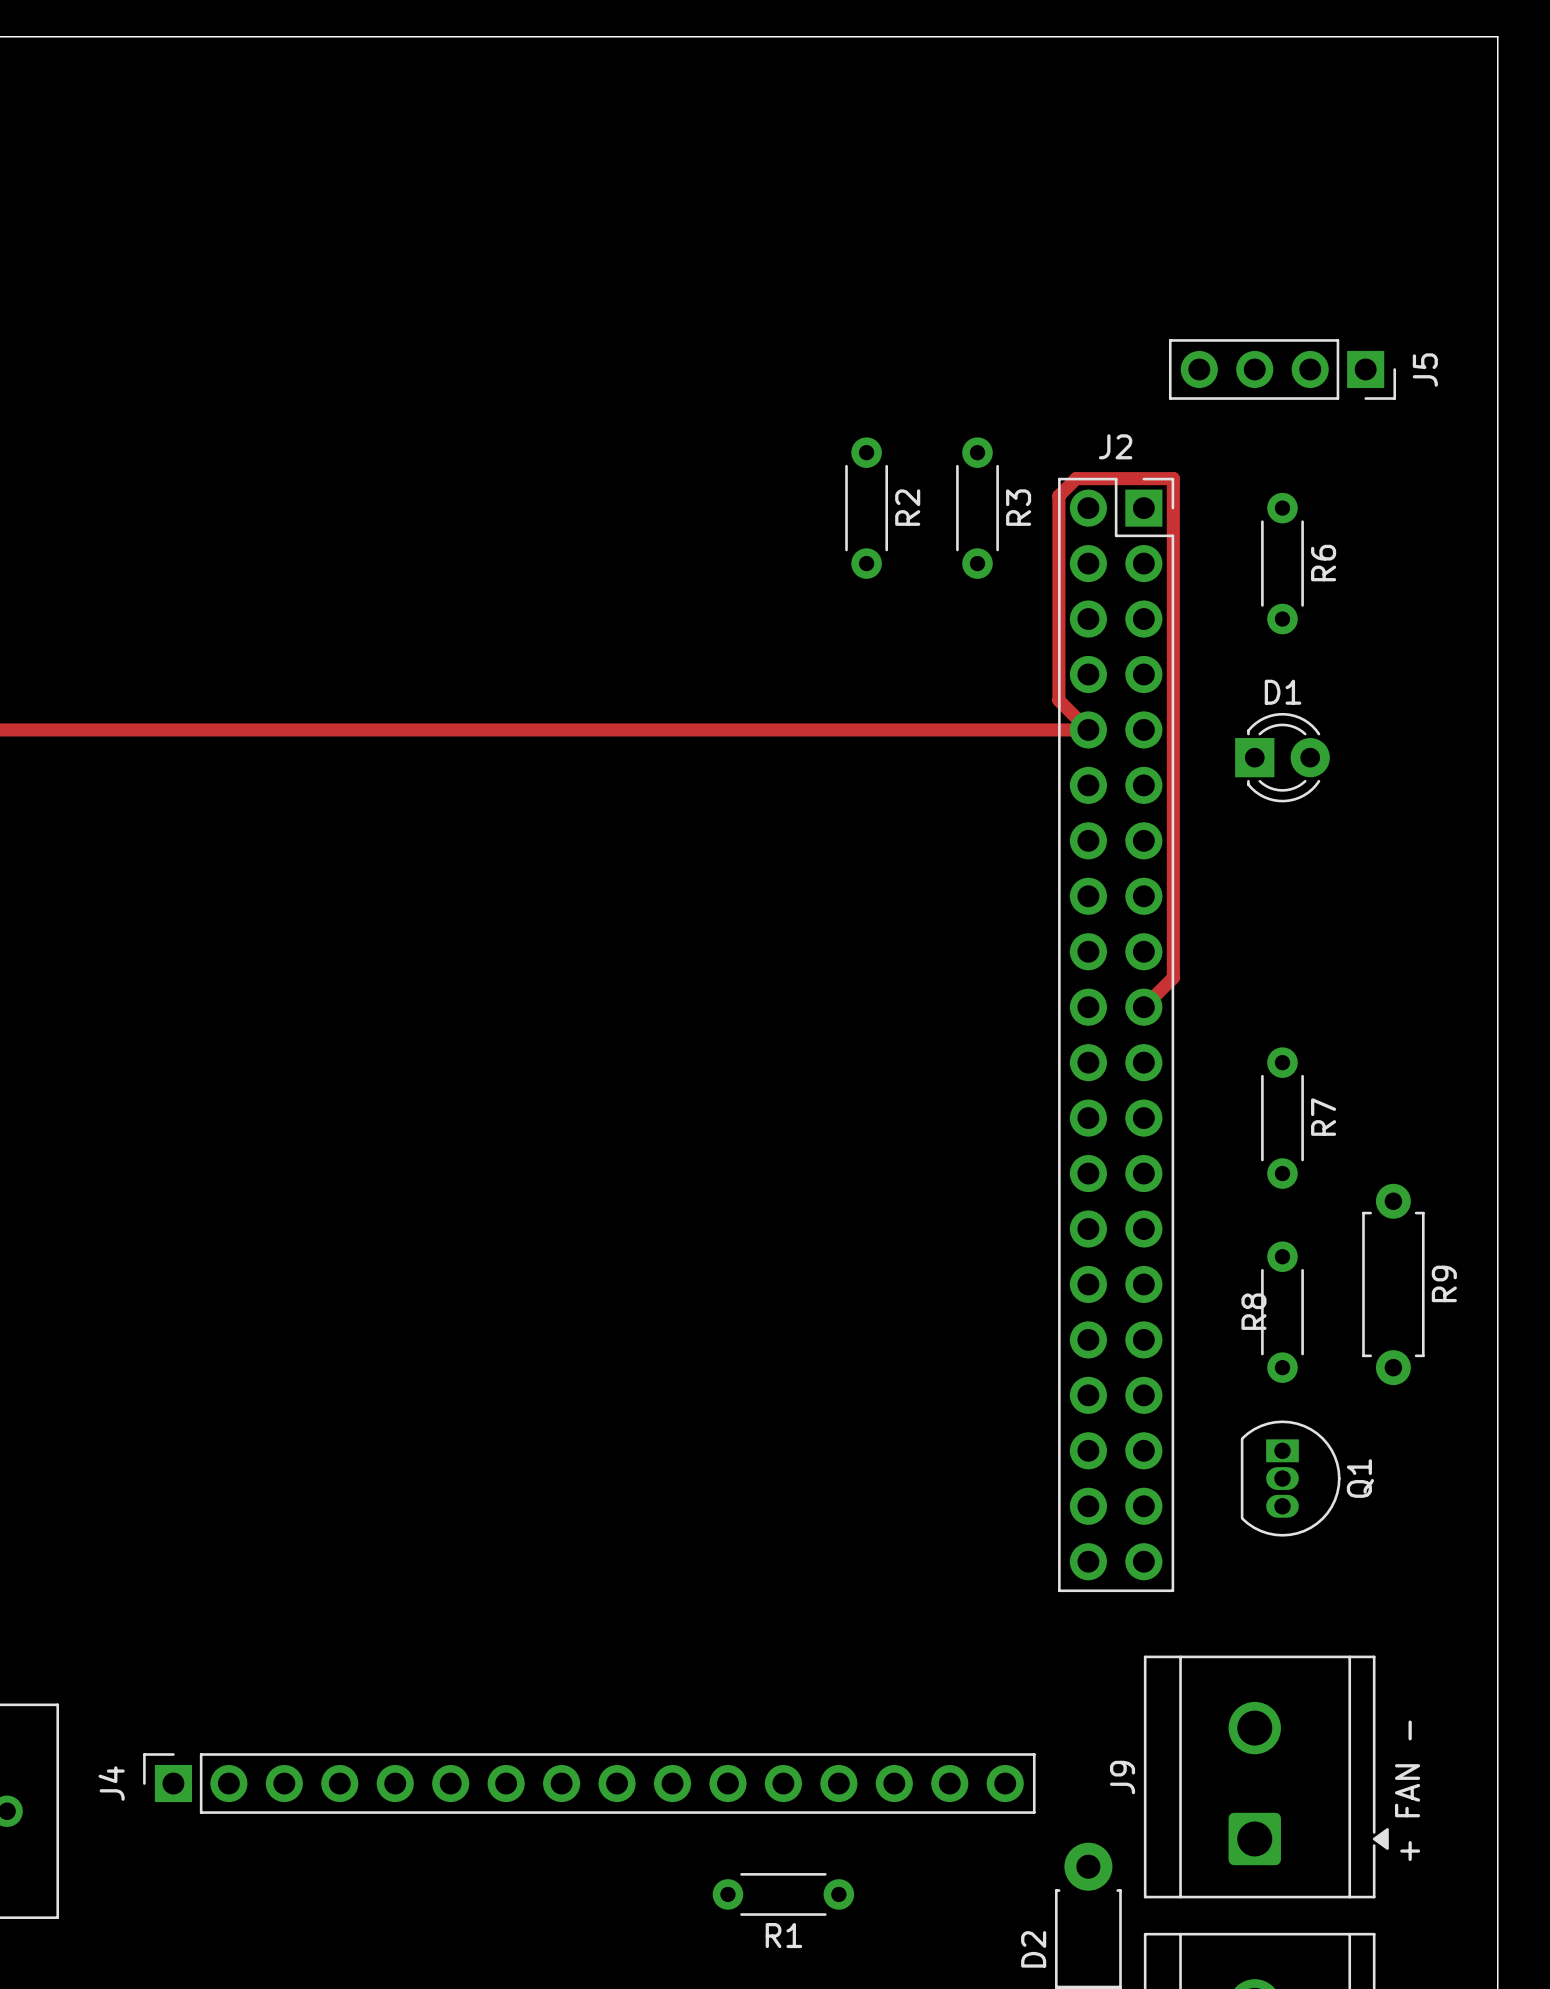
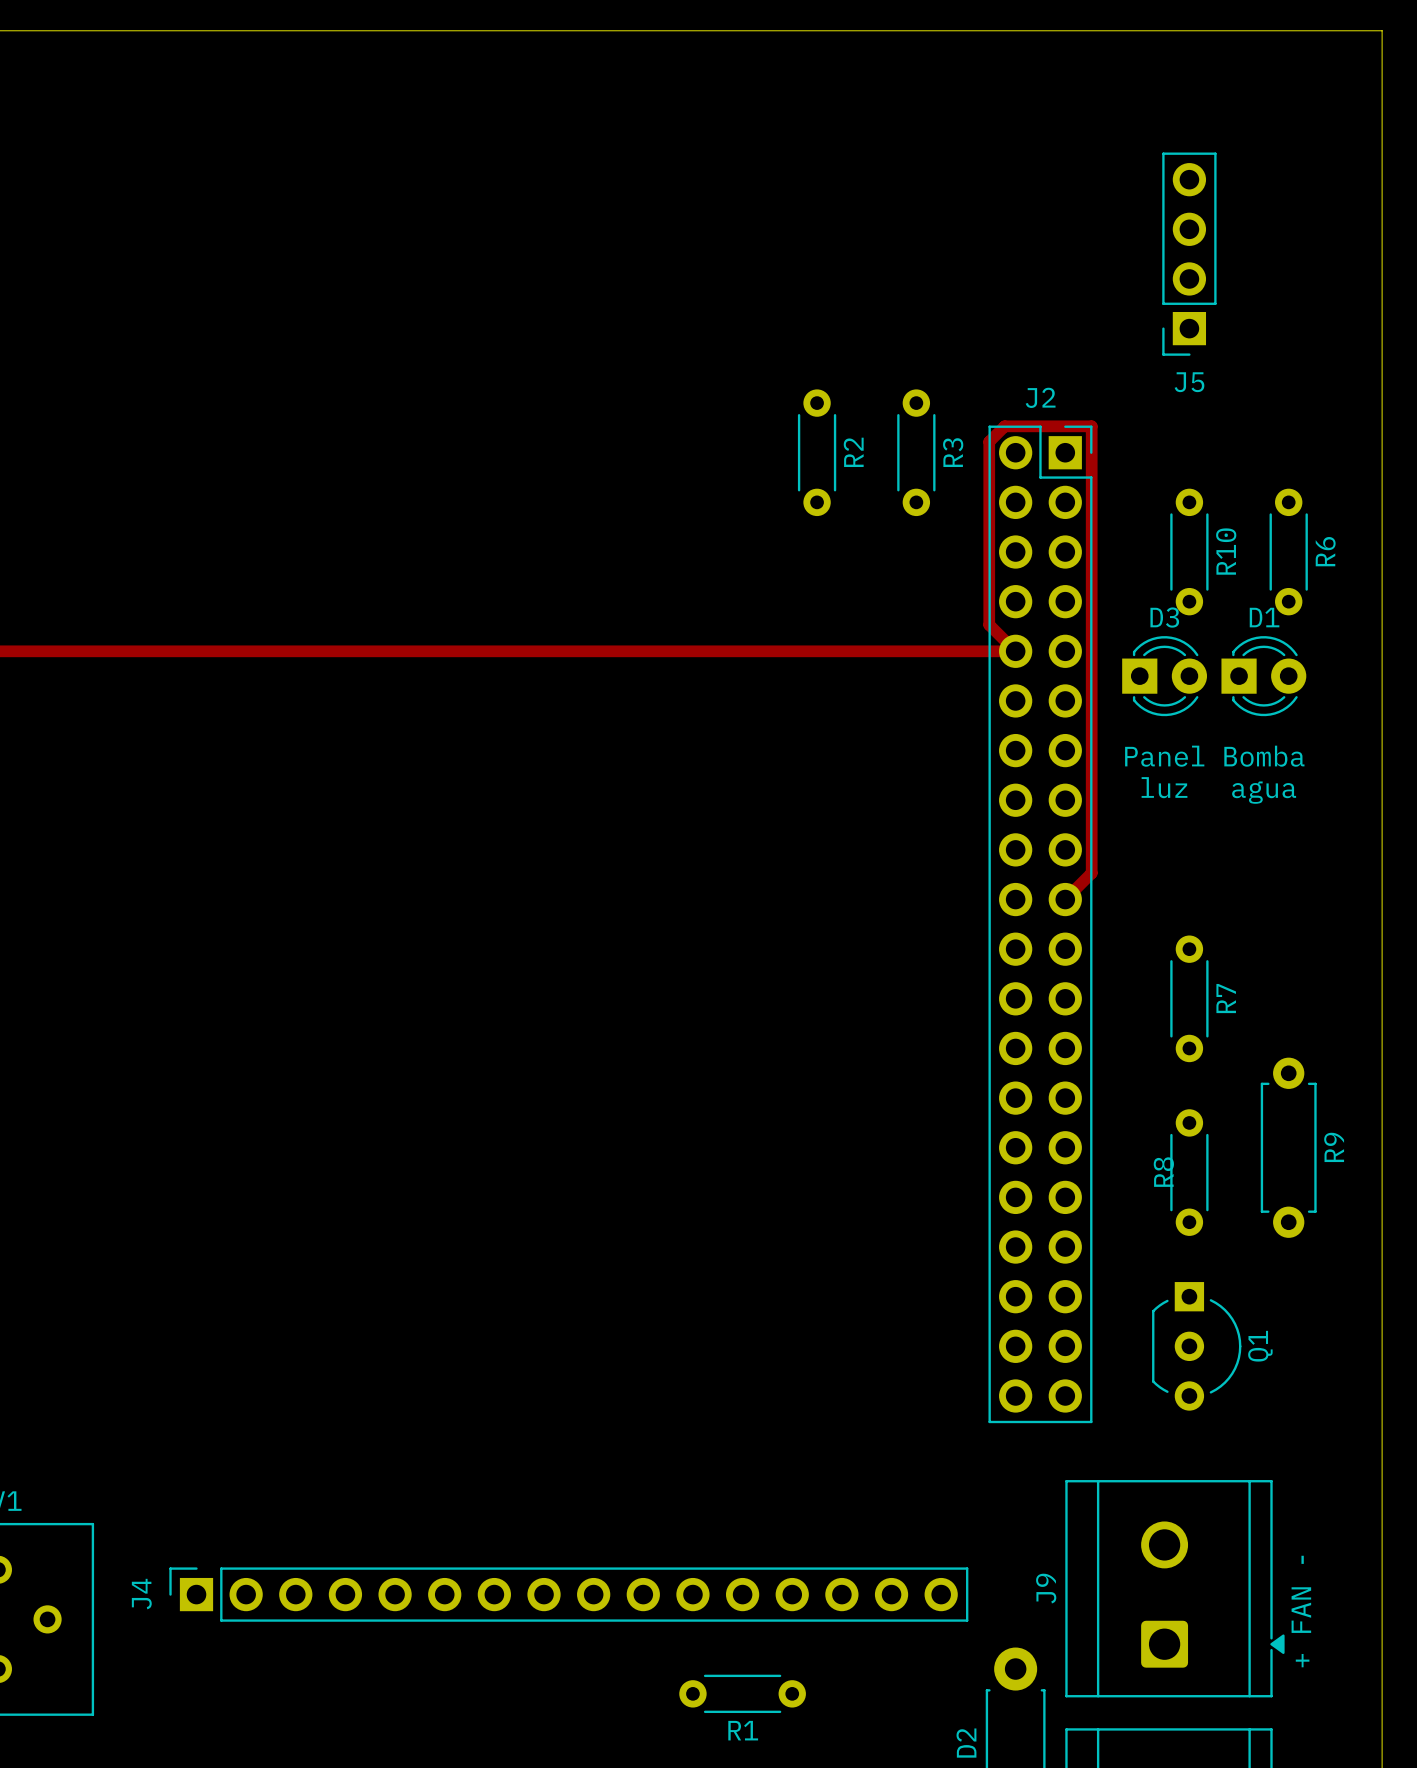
J5 rotation: 0° (1282, 369) -> 90° clockwise (1189, 254)
R6 position: (1282, 563) -> (1288, 552)
R10: none -> (1189, 552)
D3: none -> (1164, 676)
D1 position: (1282, 757) -> (1263, 676)
text: none -> Panel (1164, 756)
text: none -> Bomba (1264, 756)
text: none -> luz (1164, 787)
text: none -> agua (1264, 792)
Q1 footprint: [1240, 1420, 1341, 1537] -> [1152, 1282, 1242, 1411]

